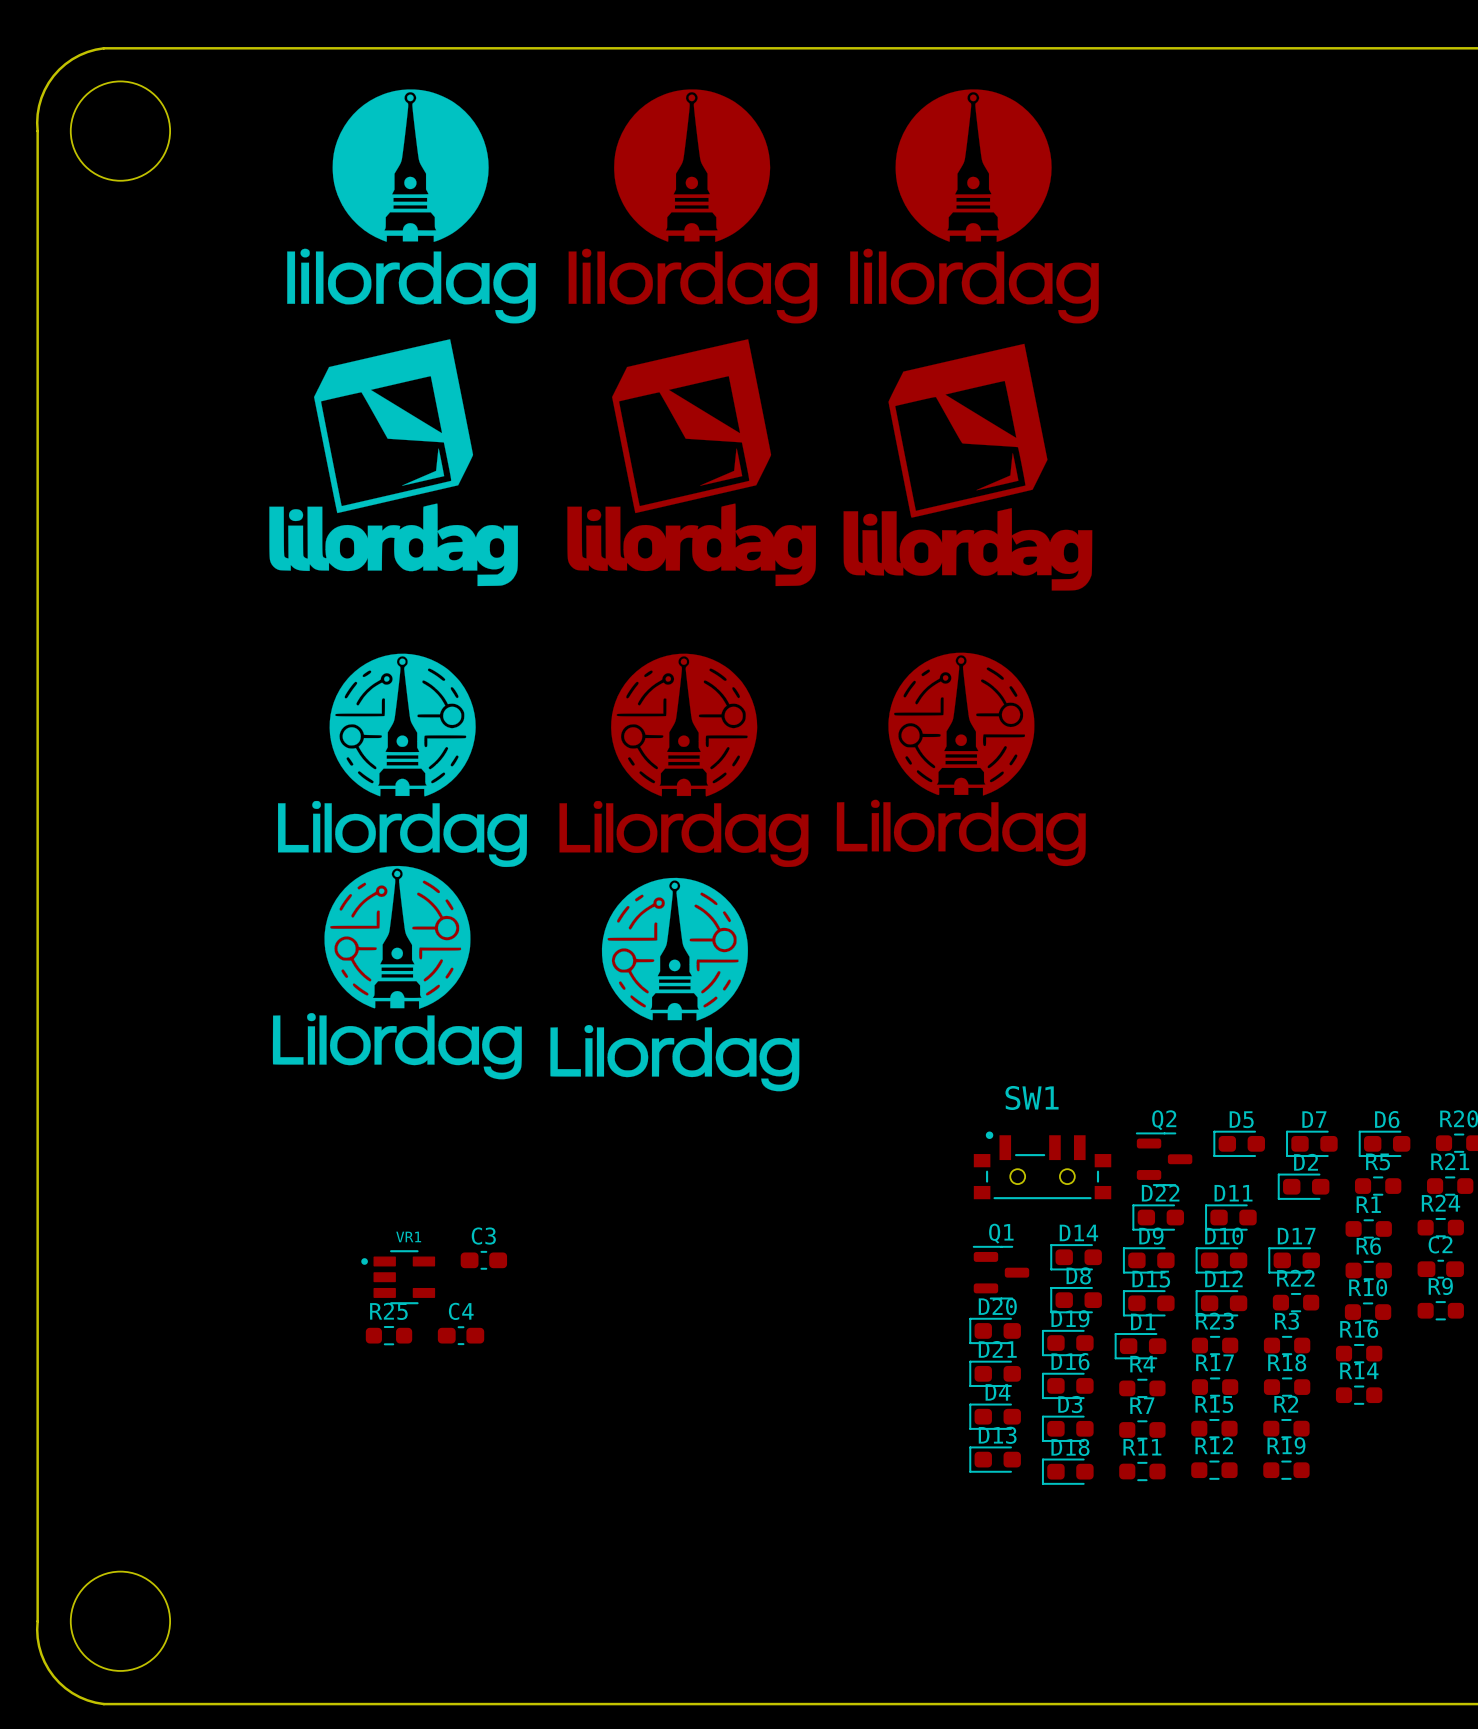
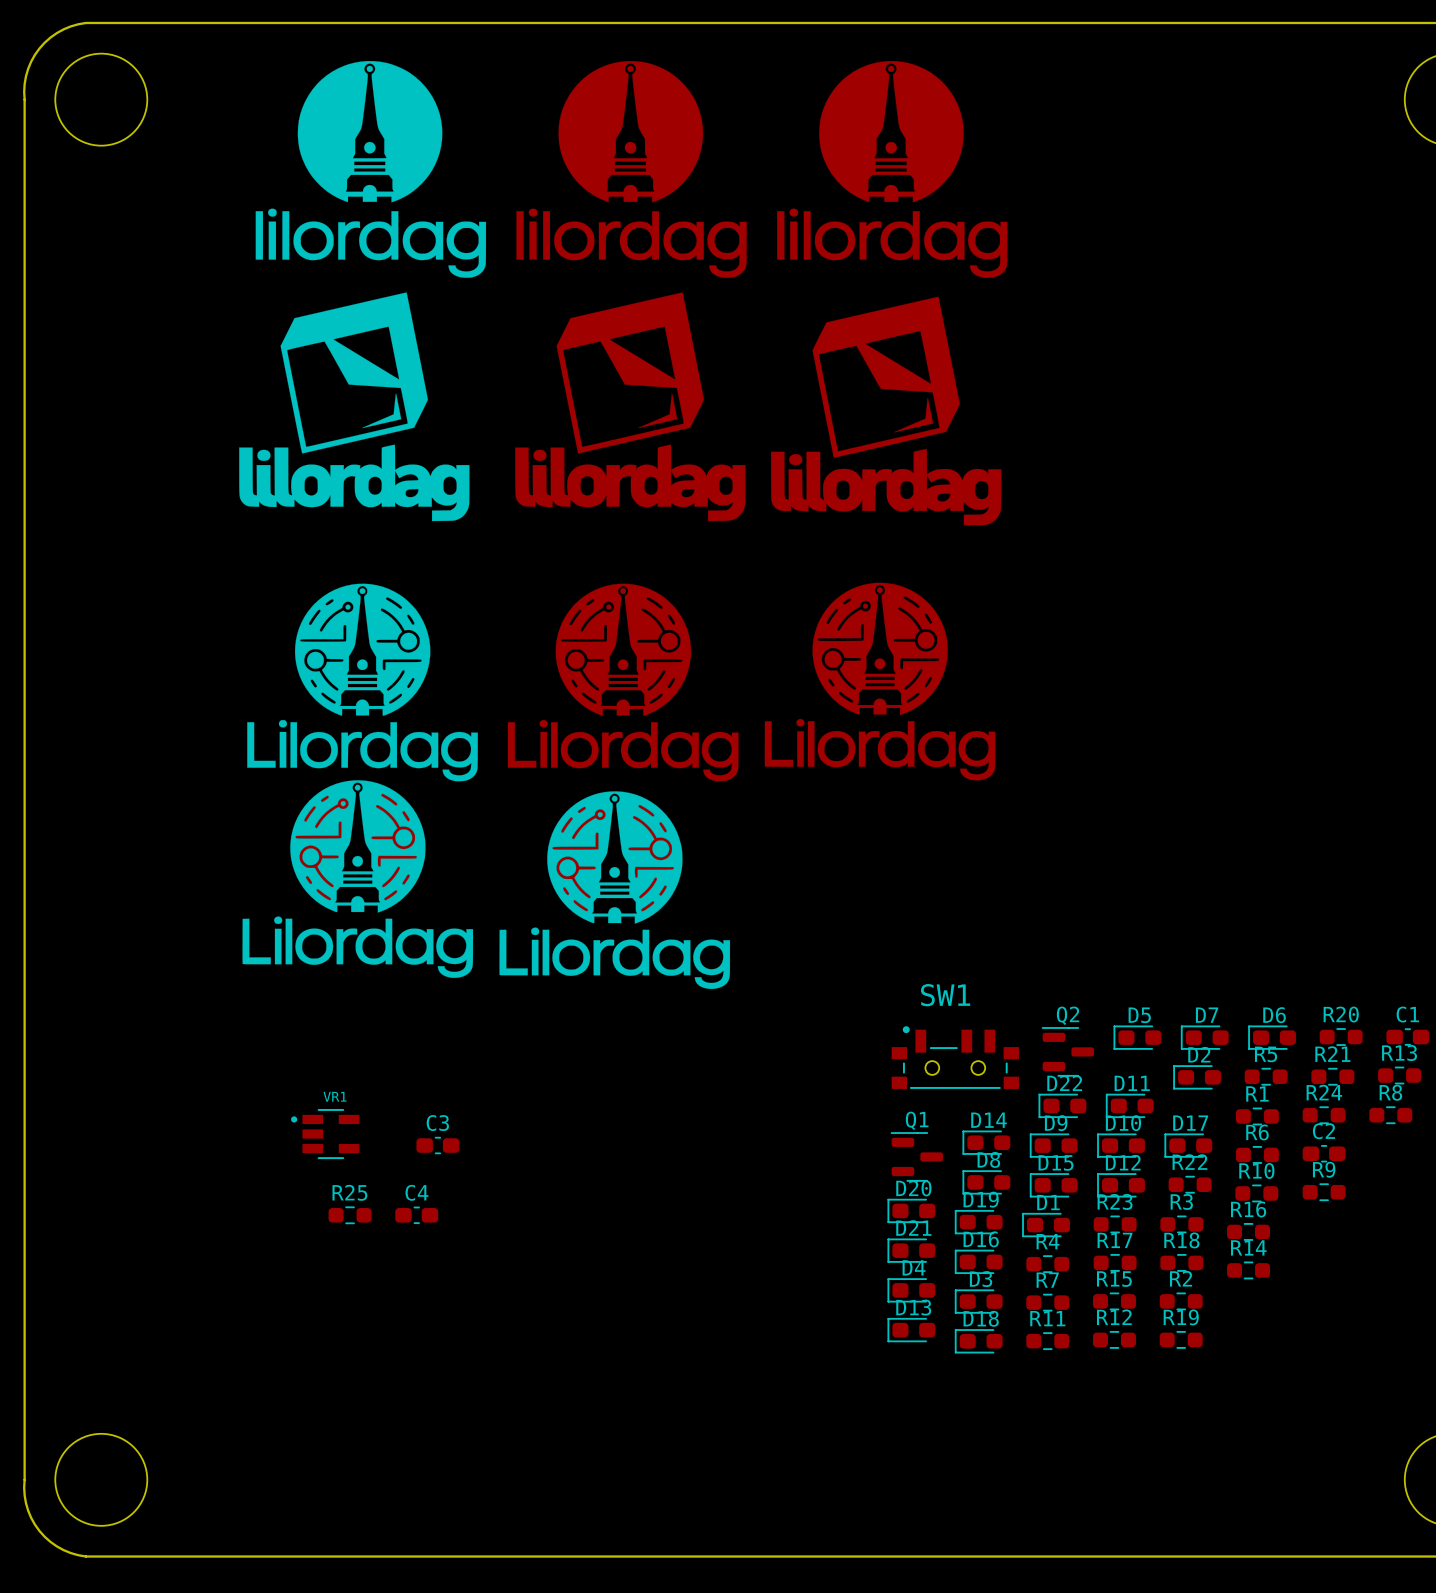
VR1 position: (398, 1277) -> (325, 1134)

